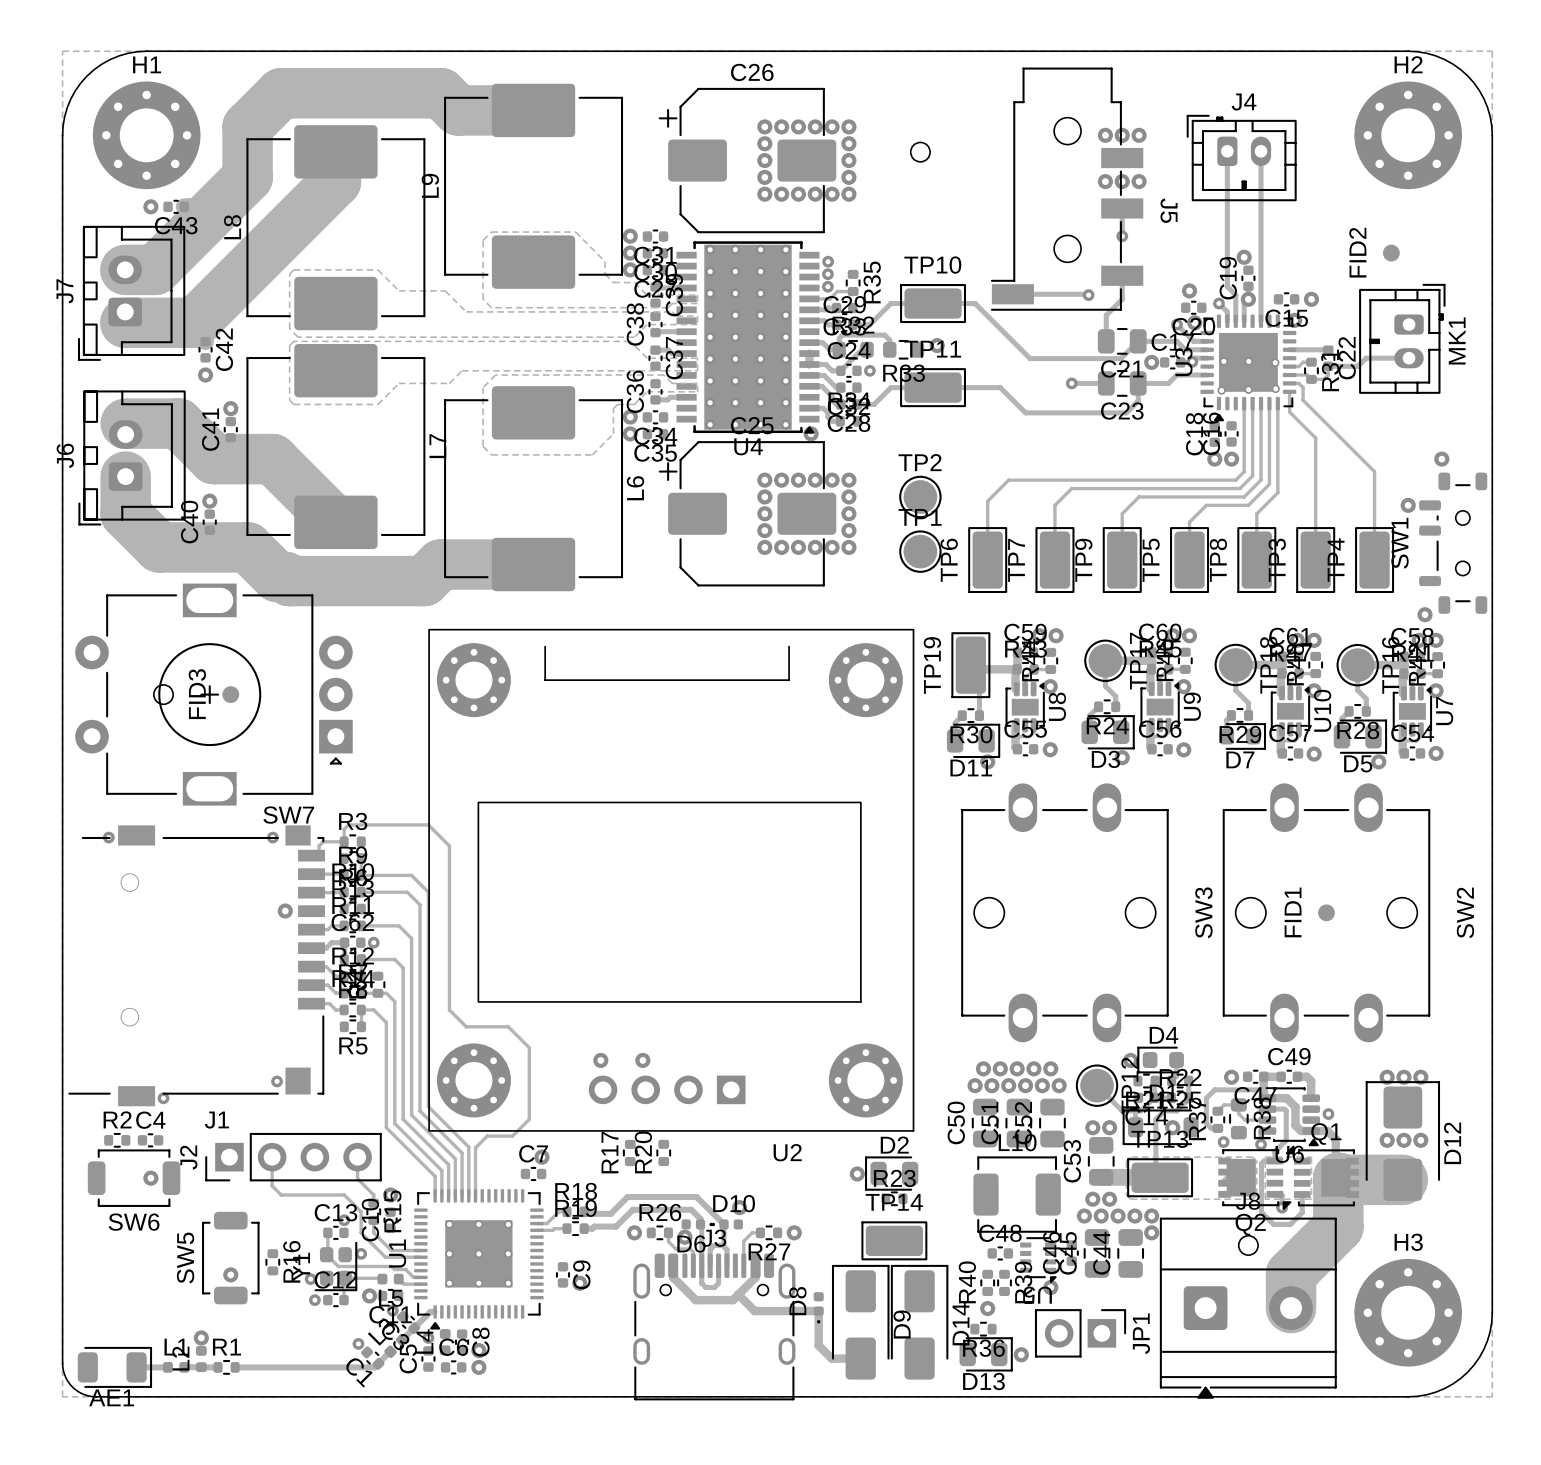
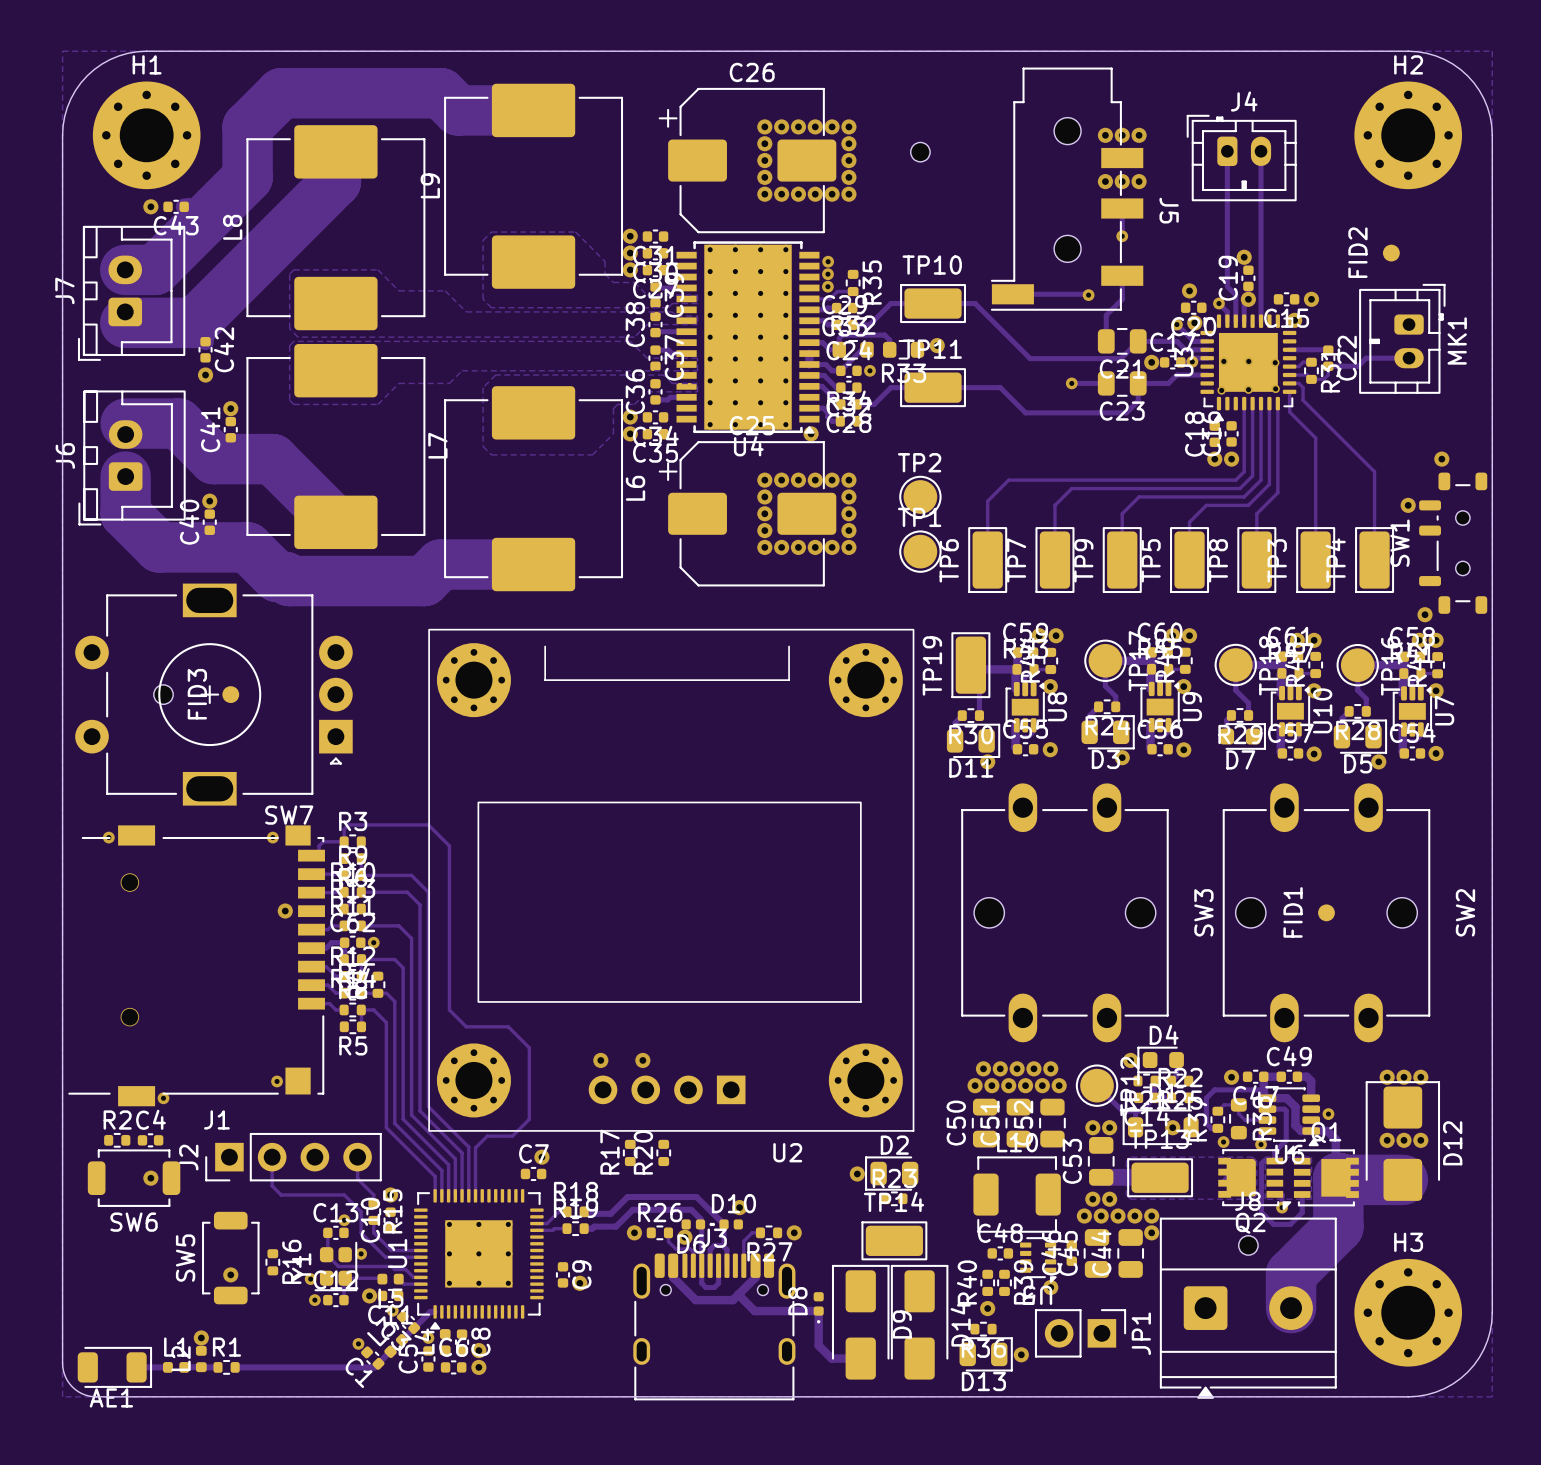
track: (1188, 1081) (1188, 1099) (1176, 1110) (1164, 1110) (1155, 1119) (1155, 1173) (1160, 1177) -> none

